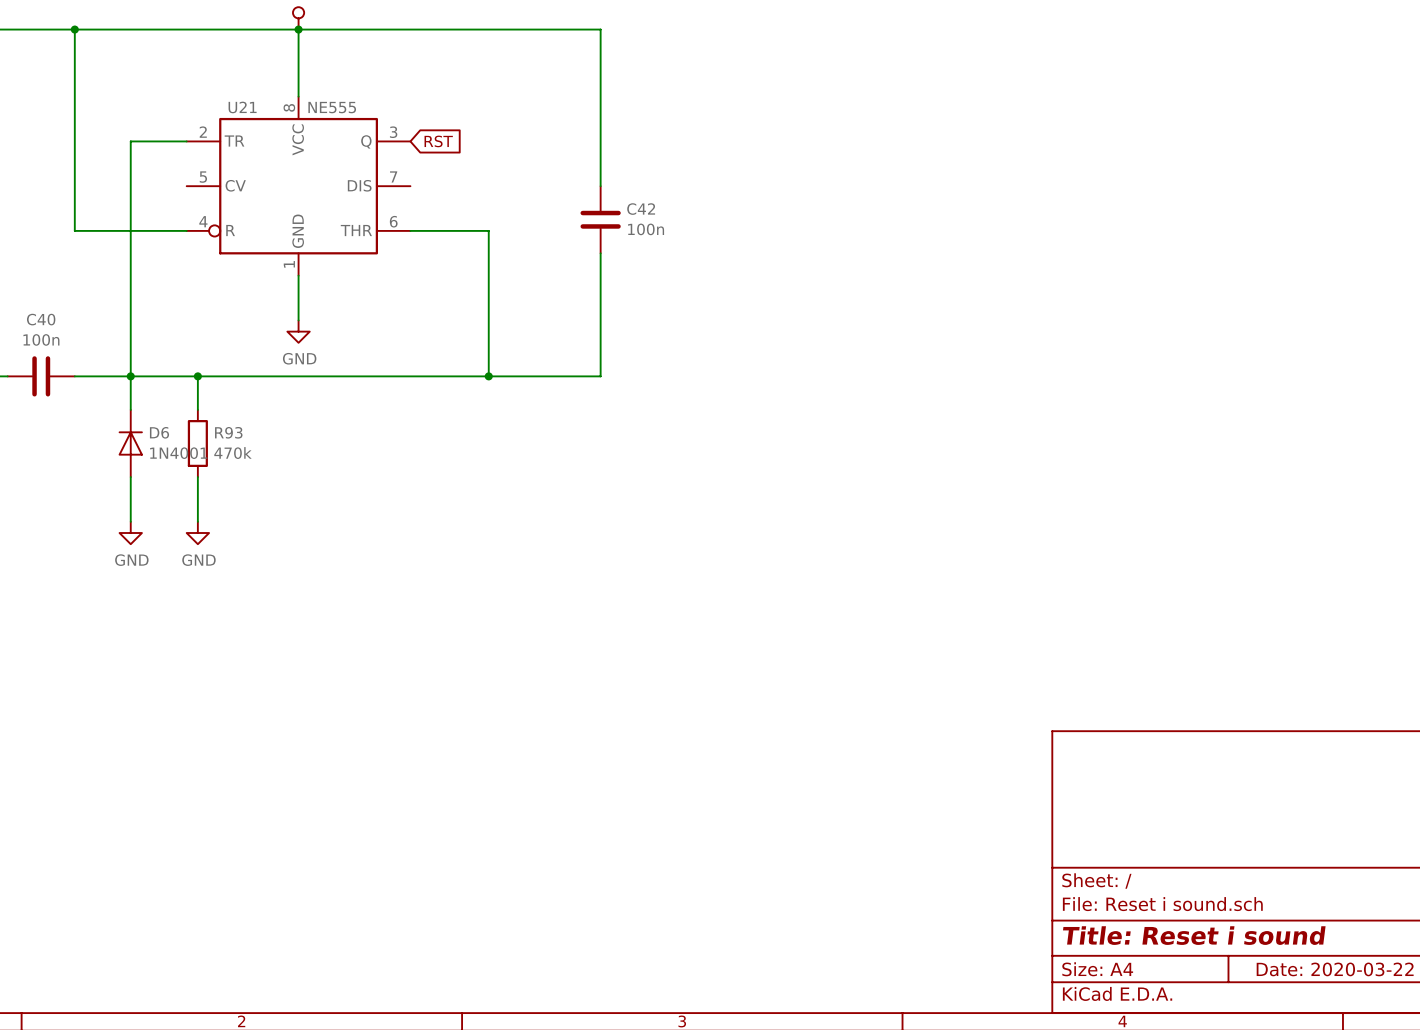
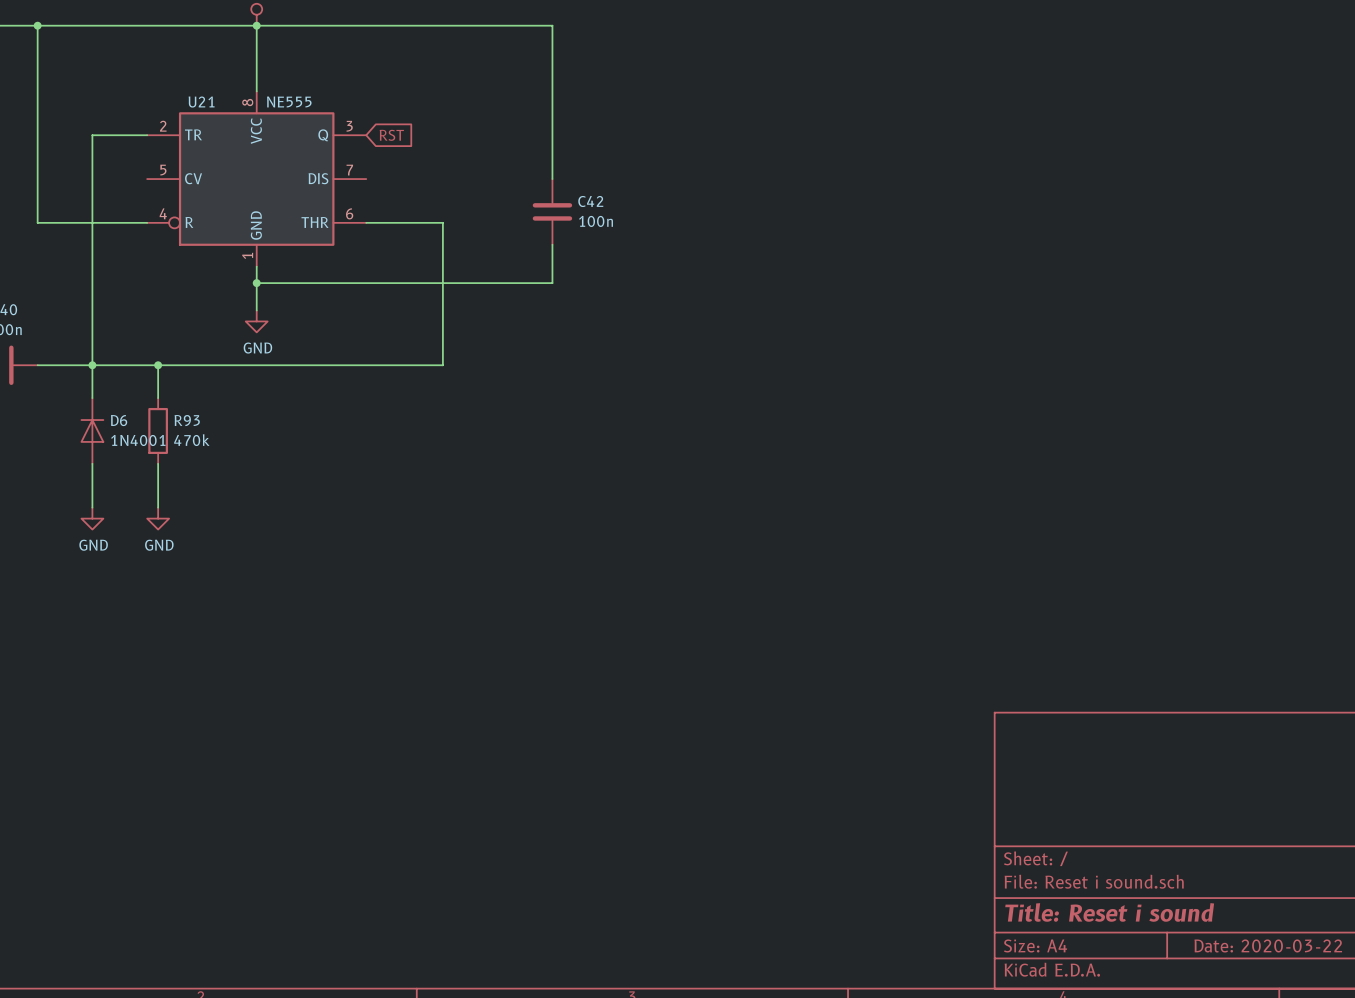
junction: none -> (256, 283)
wire: (600, 292) (600, 376) (488, 376) -> (552, 283) (256, 283)
junction: (488, 376) -> none

